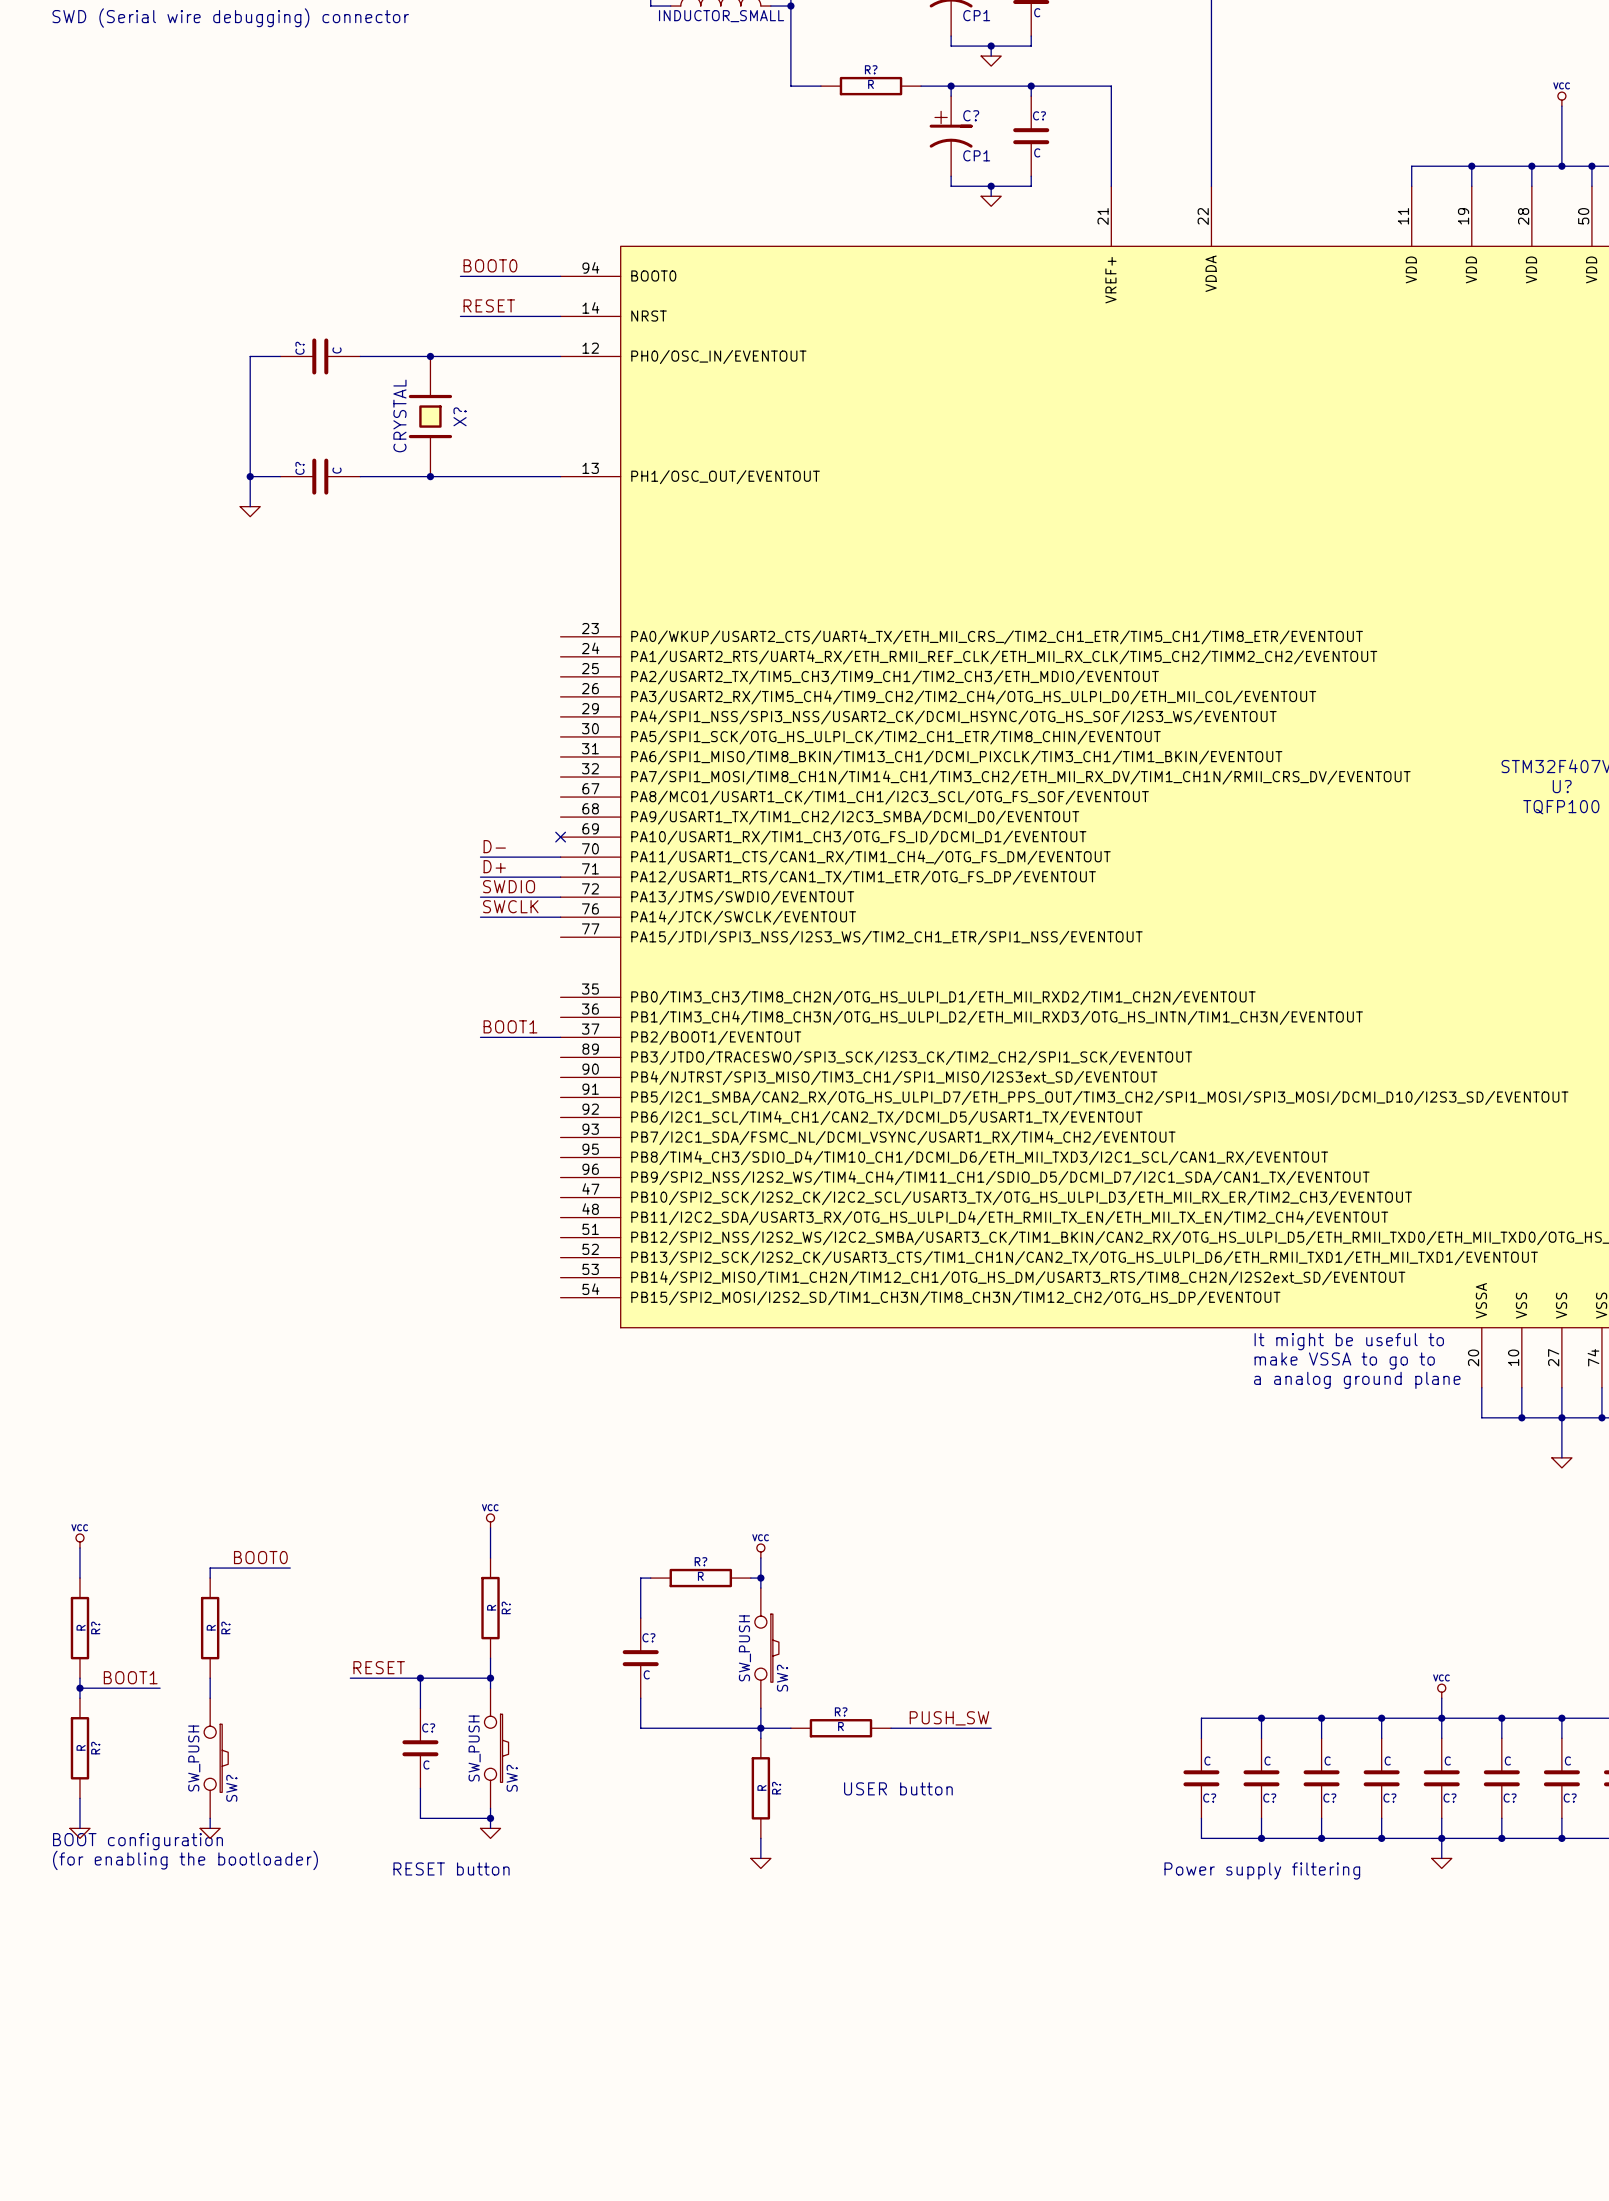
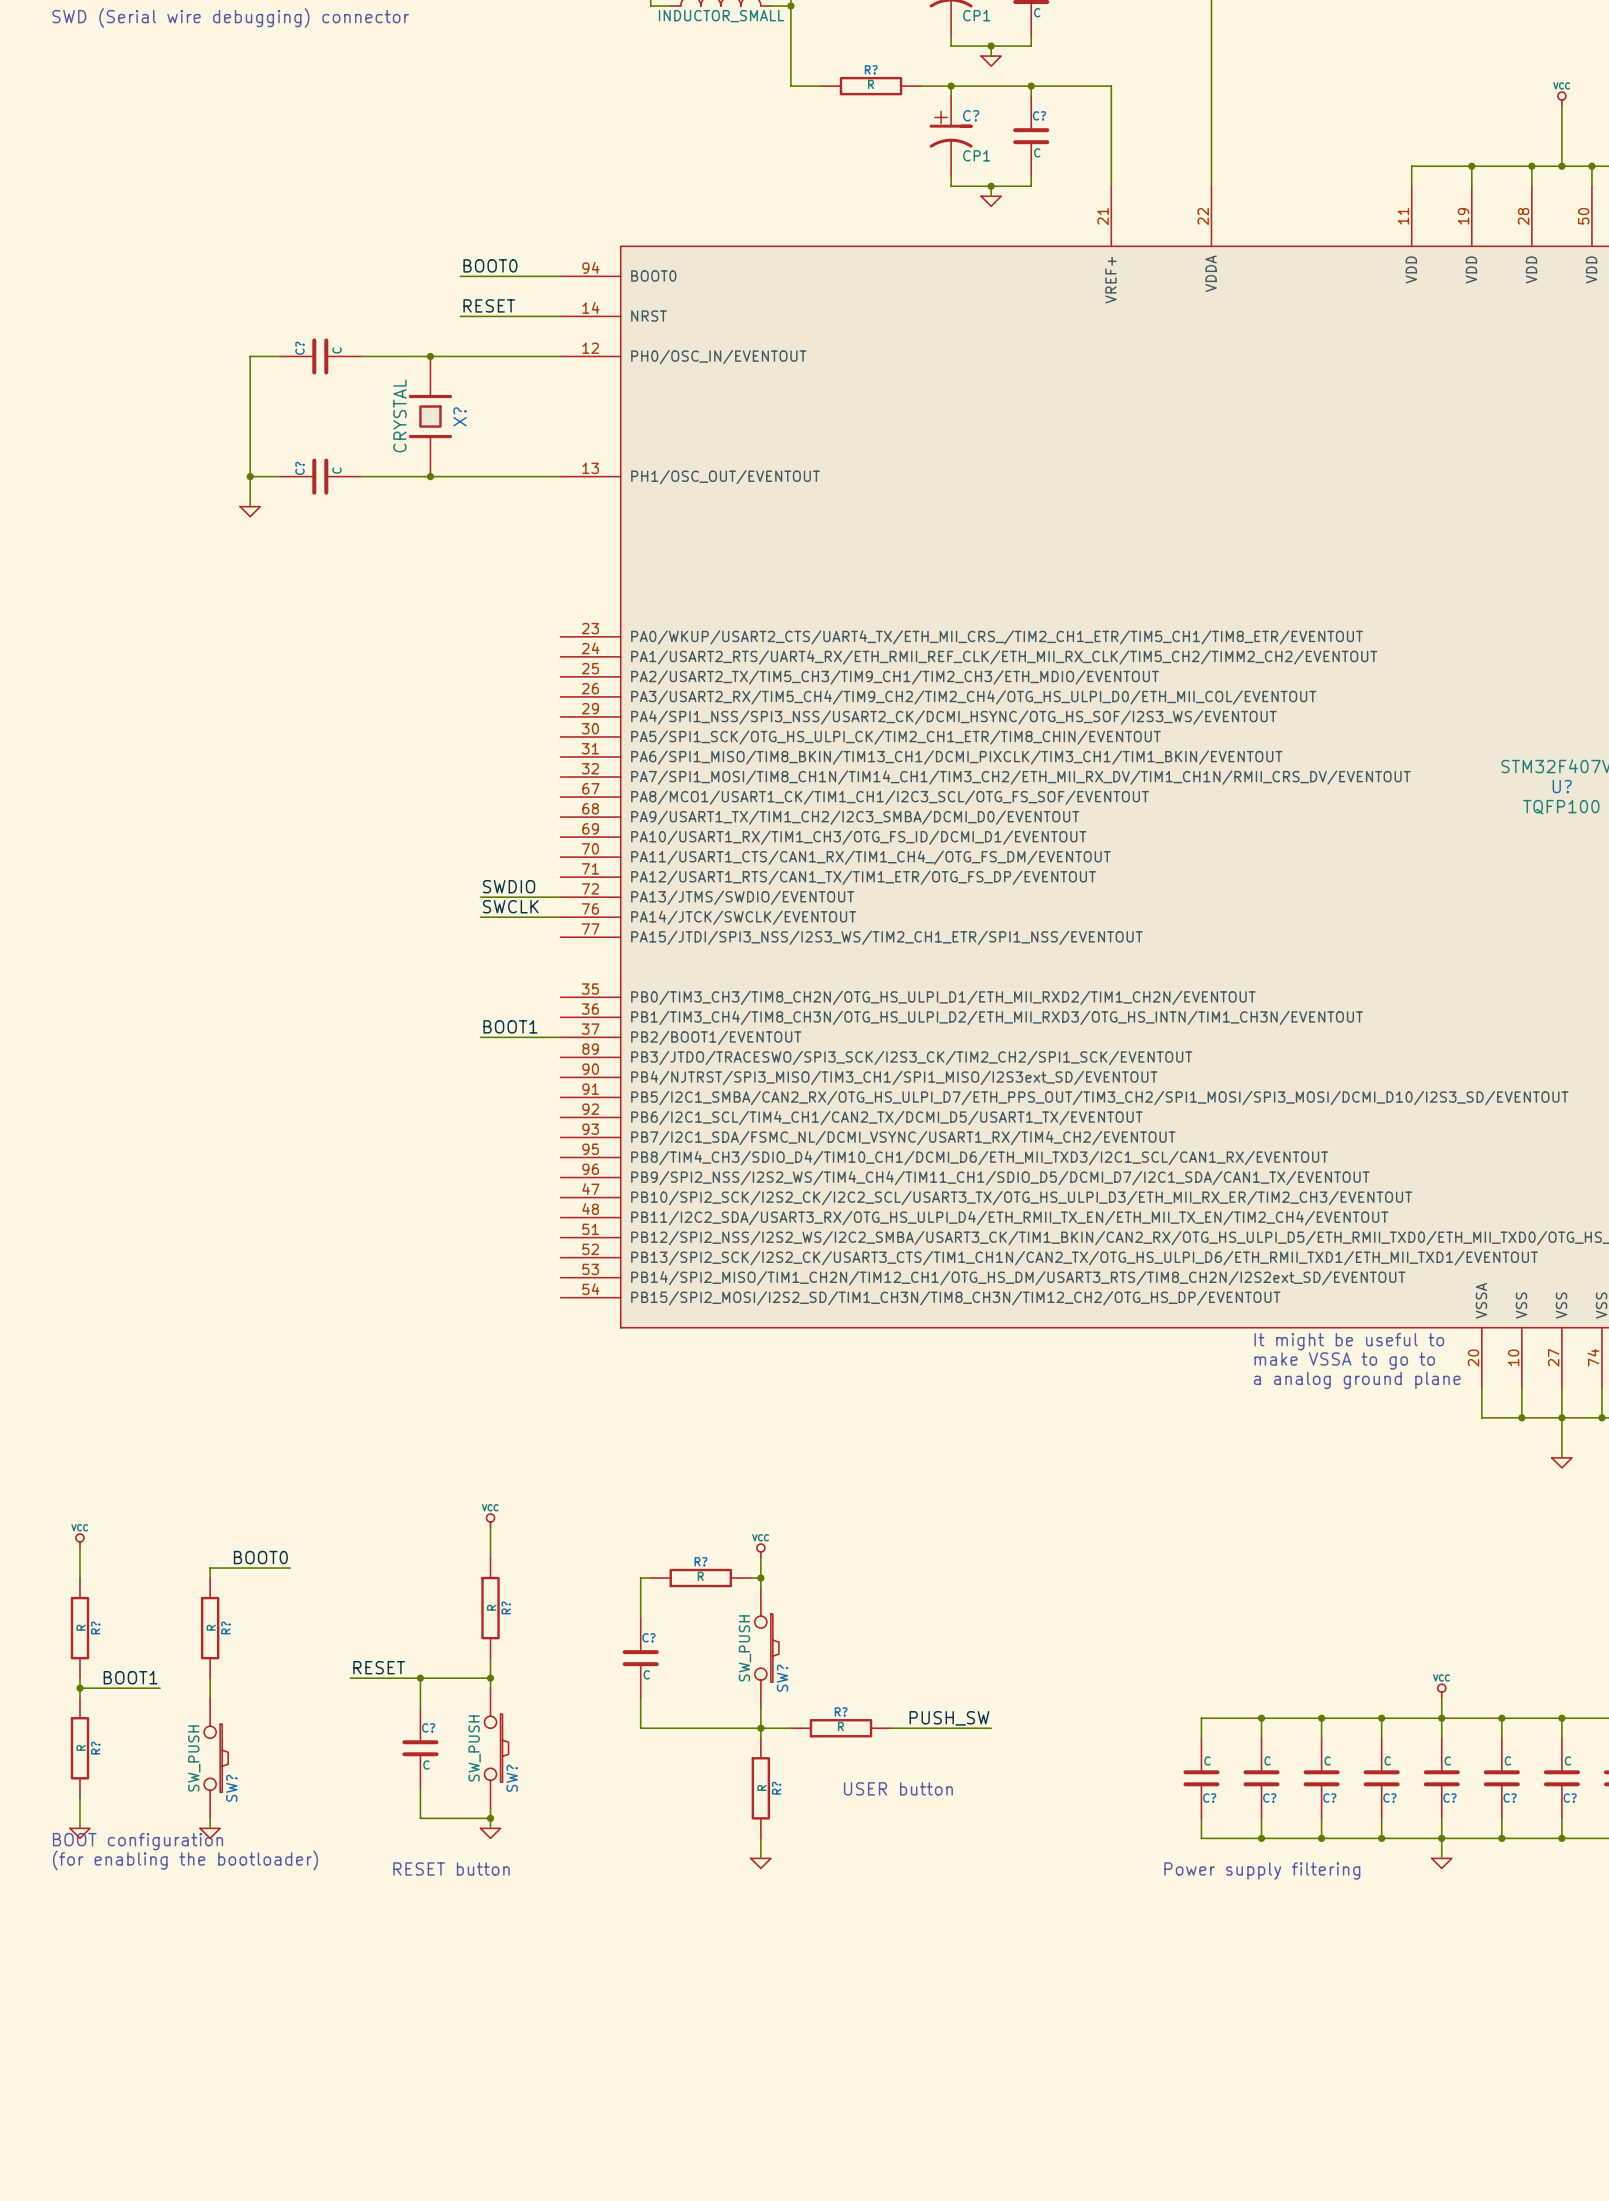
no-connect mark: (560, 837) -> none
label: D- (494, 846) -> none
wire: (480, 857) (560, 857) -> none
label: D+ (494, 866) -> none
wire: (480, 877) (560, 877) -> none

